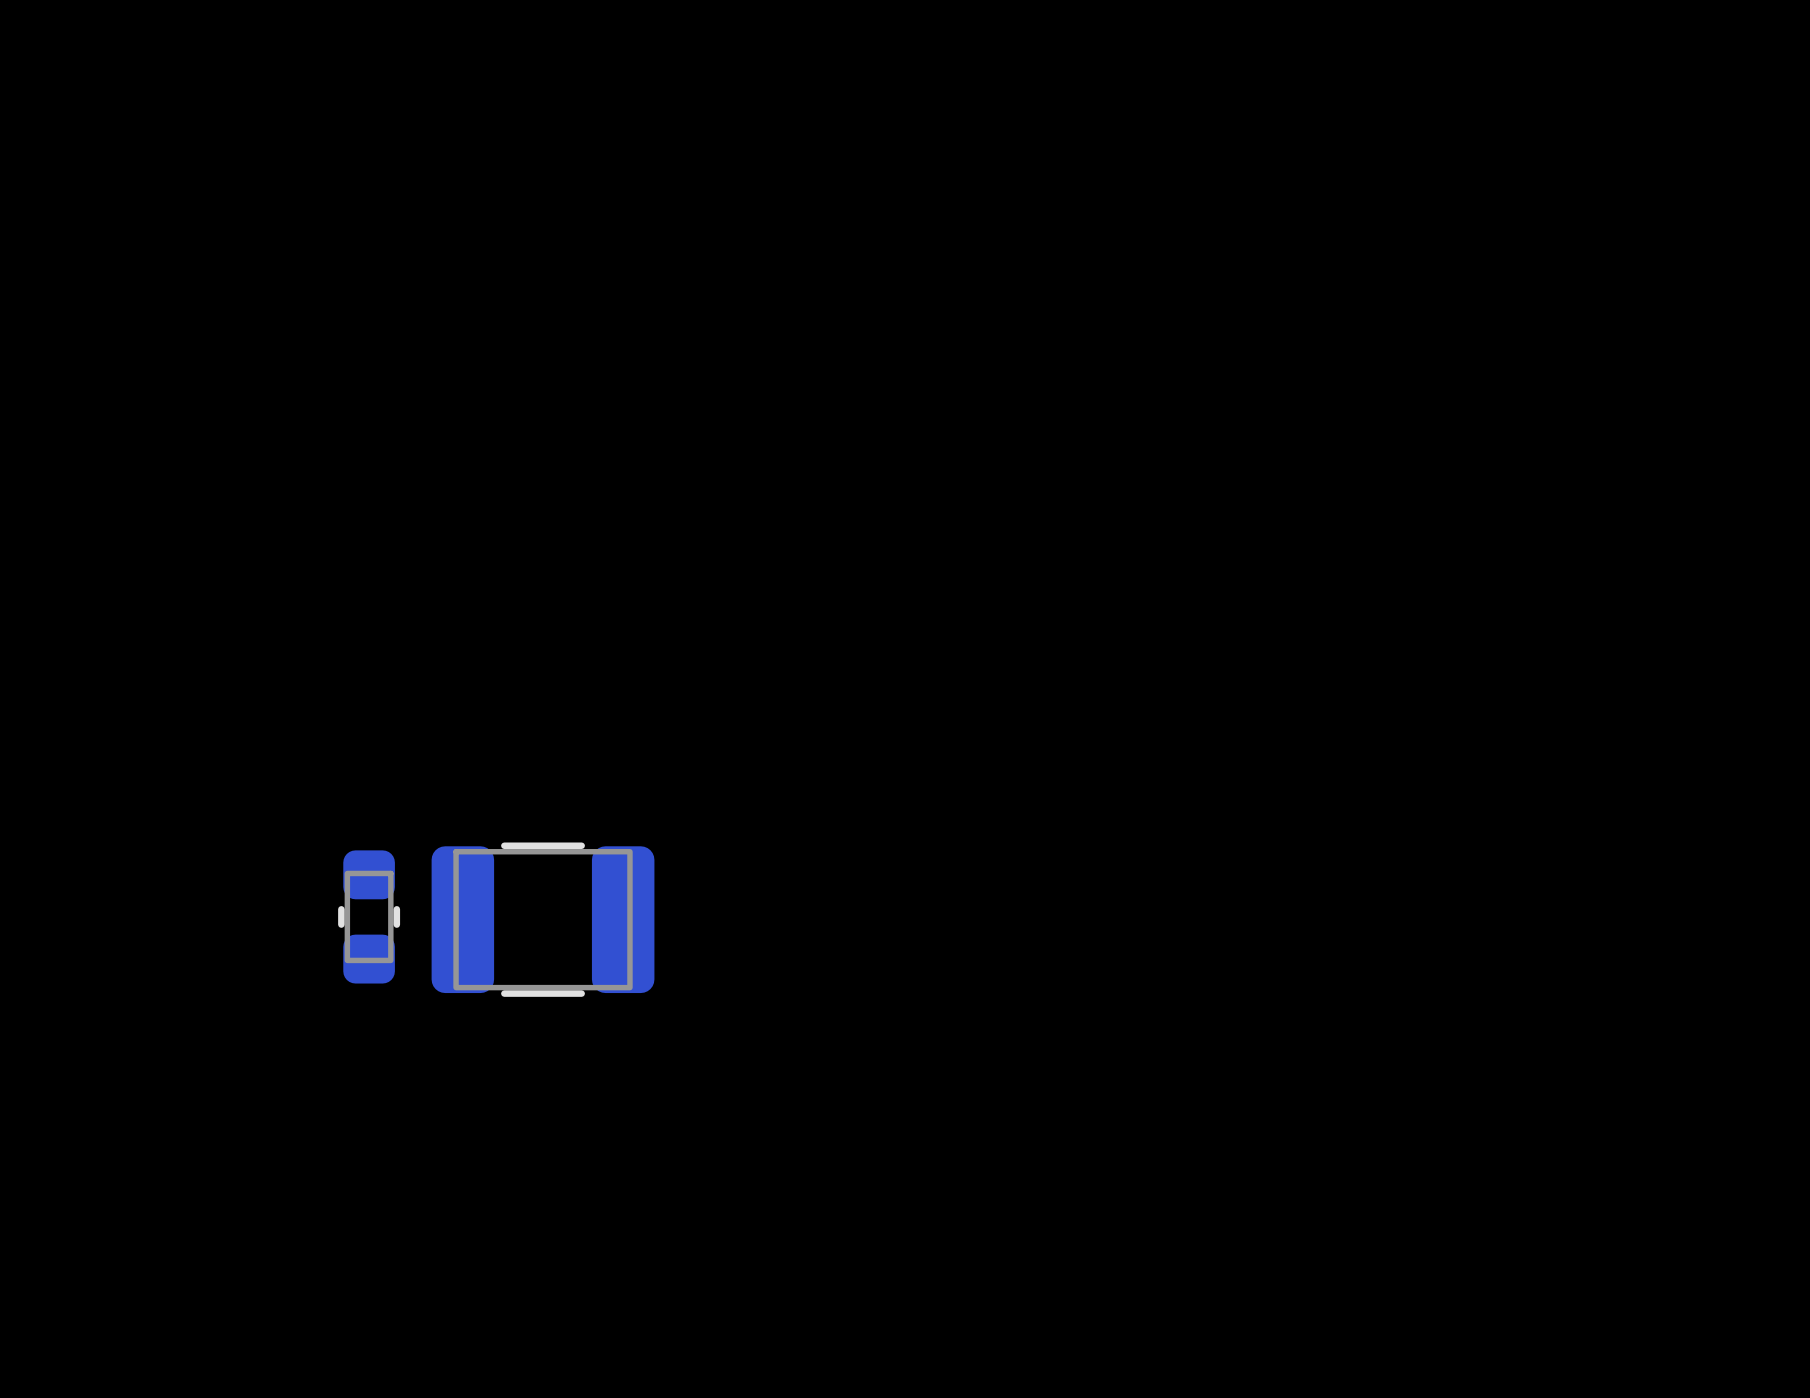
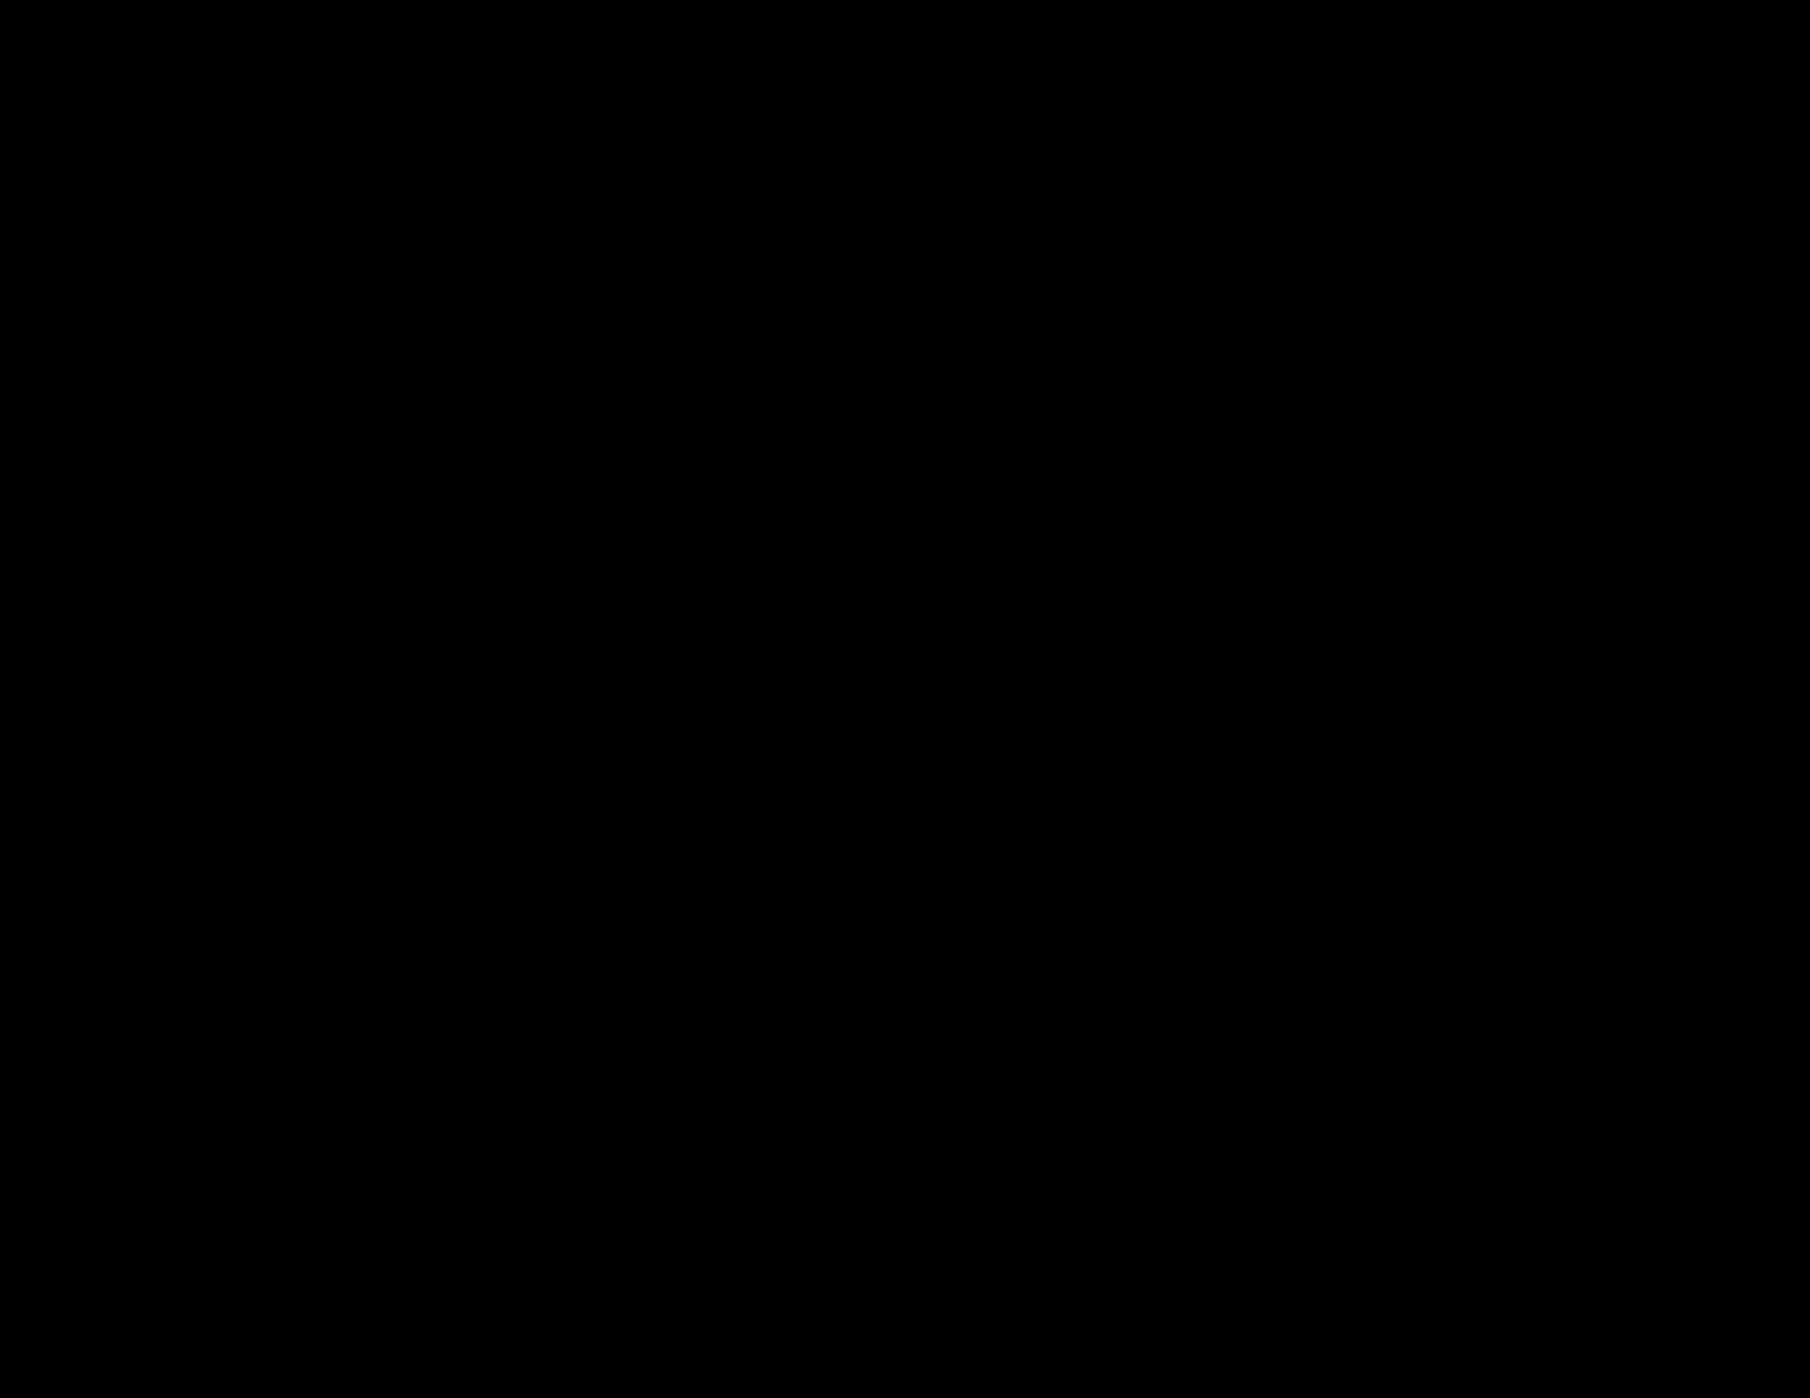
part: (369, 916) -> none
part: (543, 919) -> none

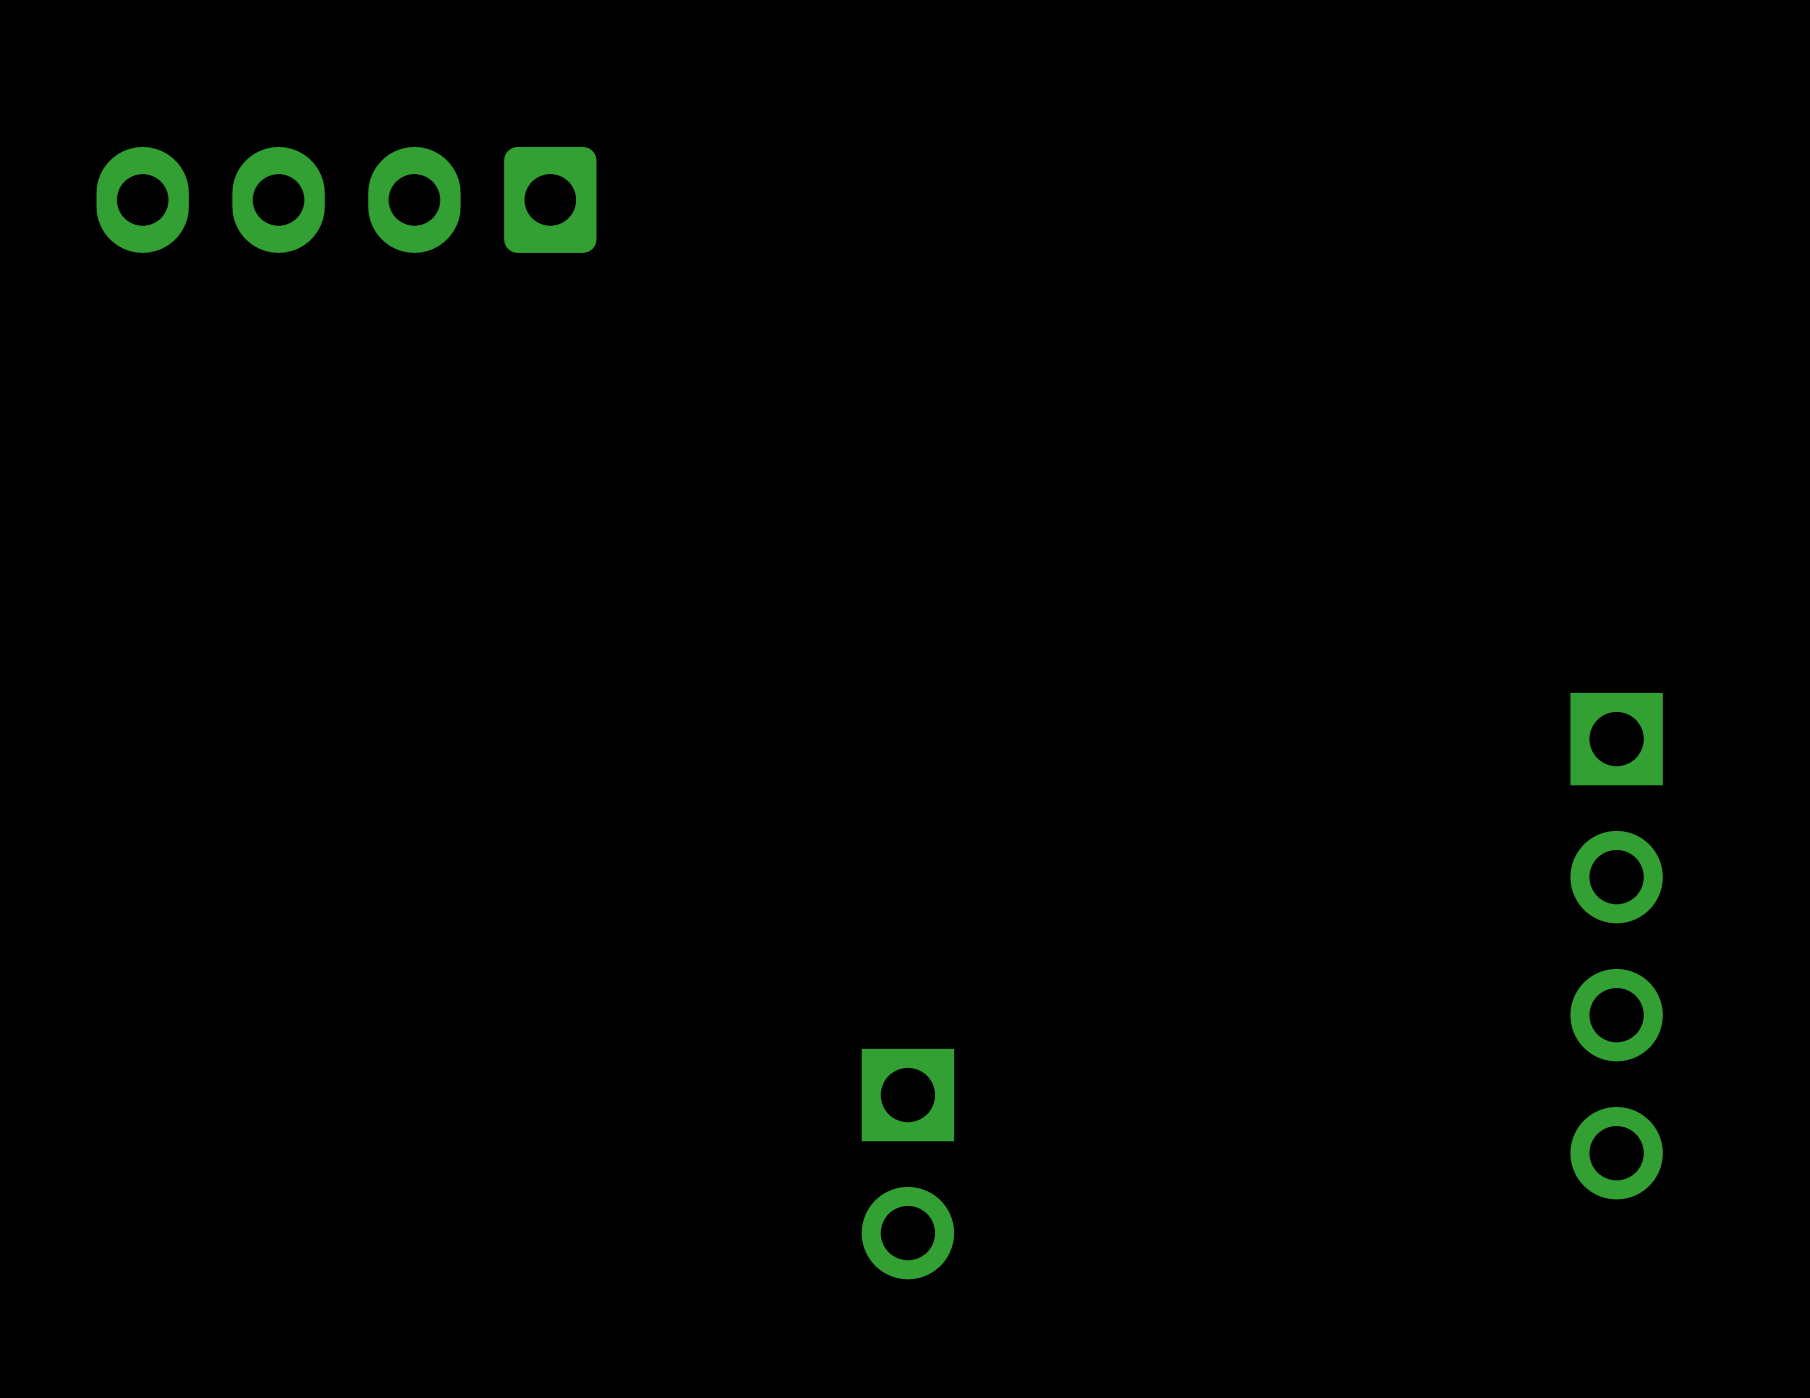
part: none -> (346, 199)
part: none -> (1616, 946)
part: none -> (907, 1164)

